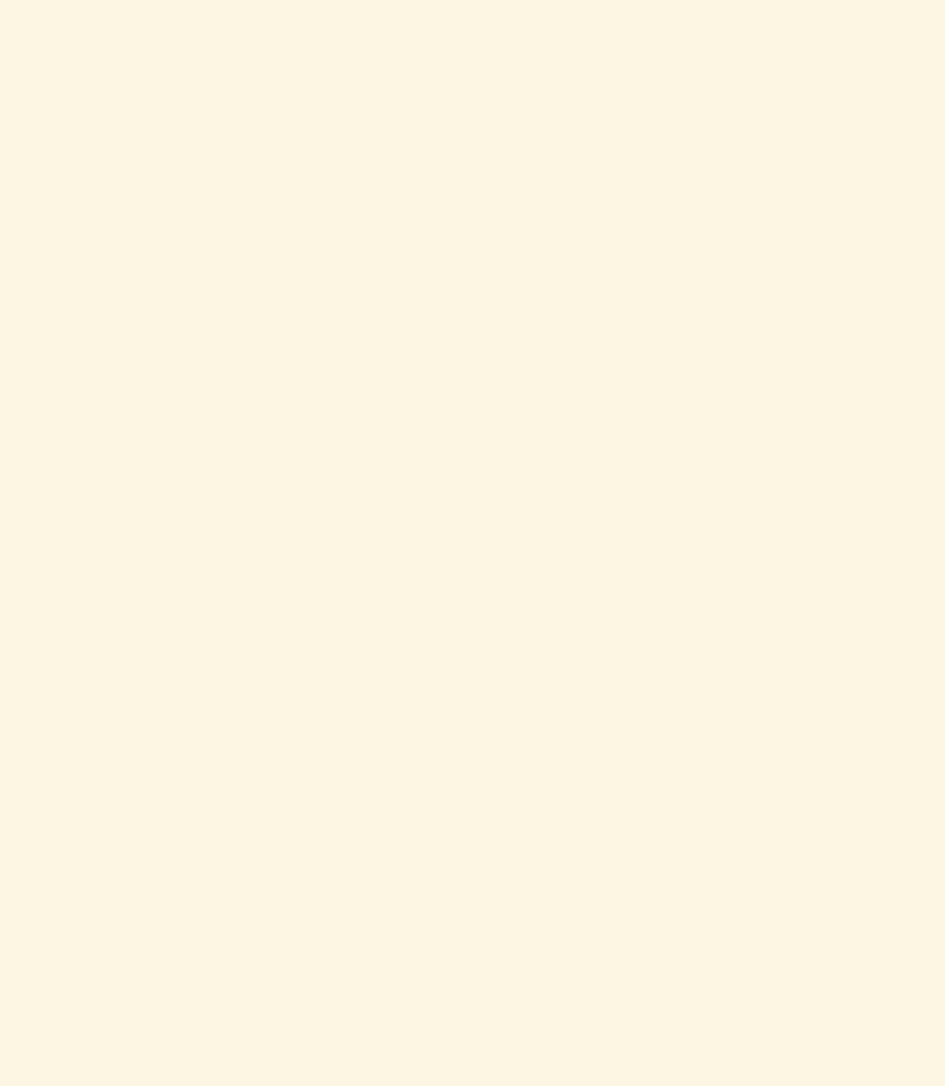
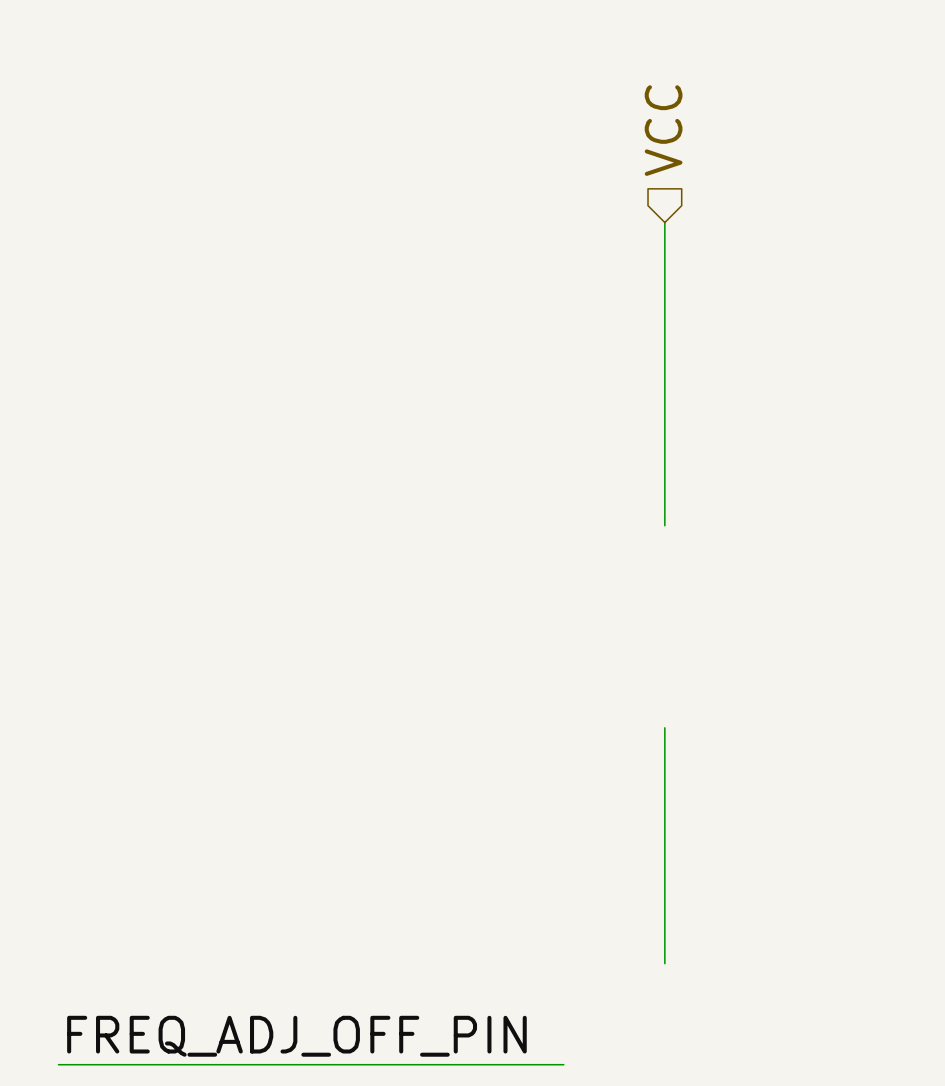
hierarchical label: none -> VCC (663, 130)
wire: none -> (664, 222) (664, 525)
wire: none -> (664, 727) (664, 963)
label: none -> FREQ_ADJ_OFF_PIN (296, 1036)
wire: none -> (58, 1064) (563, 1064)

